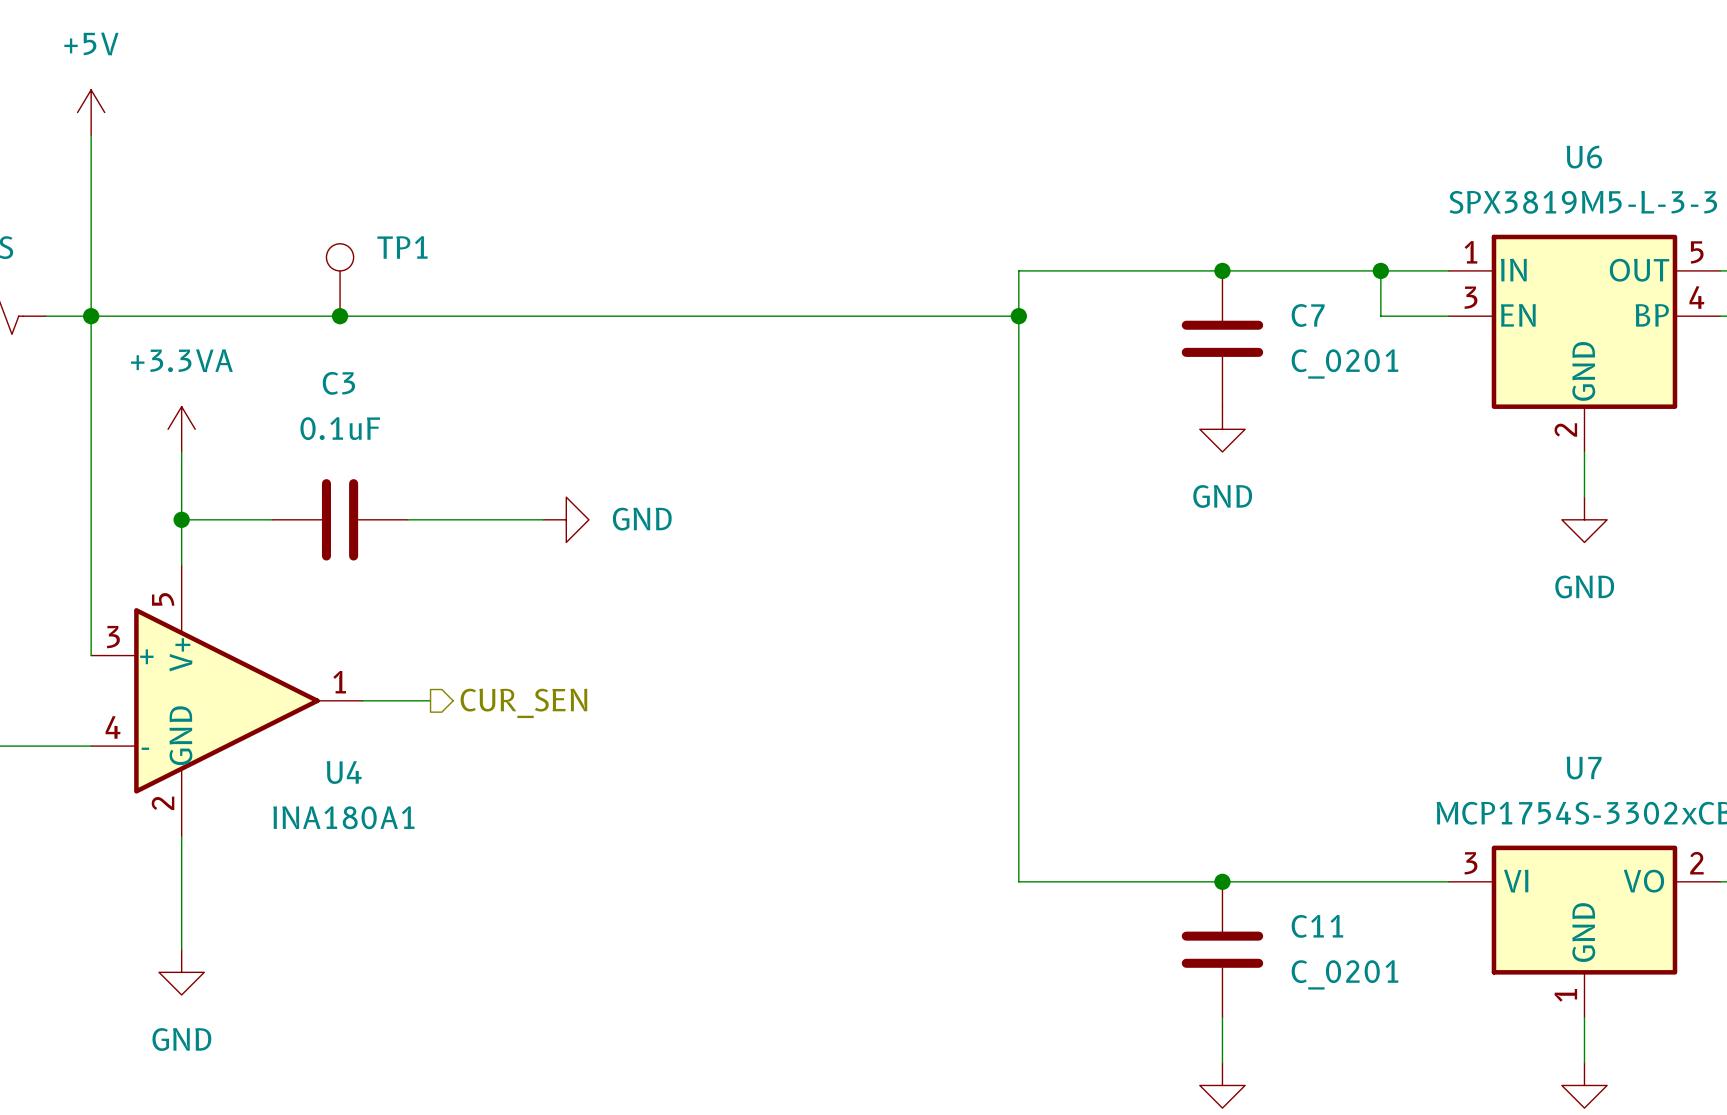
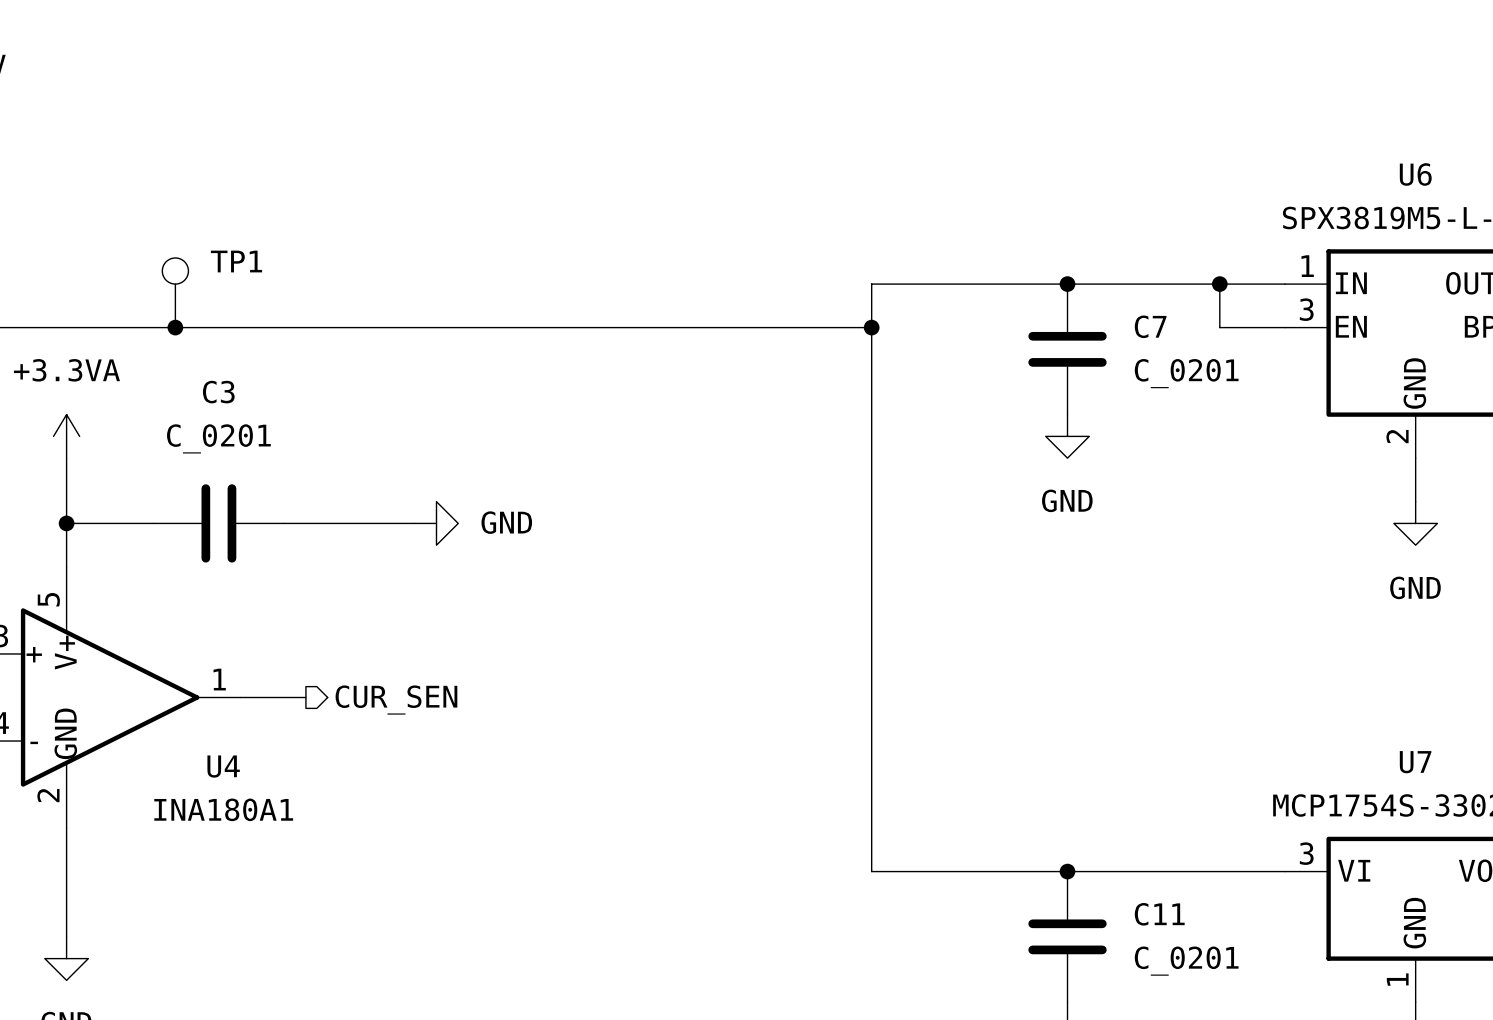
TP1 position: (340, 279) -> (175, 292)
junction position: (340, 316) -> (175, 327)
C3 value: 0.1uF (340, 428) -> C_0201 (218, 438)

